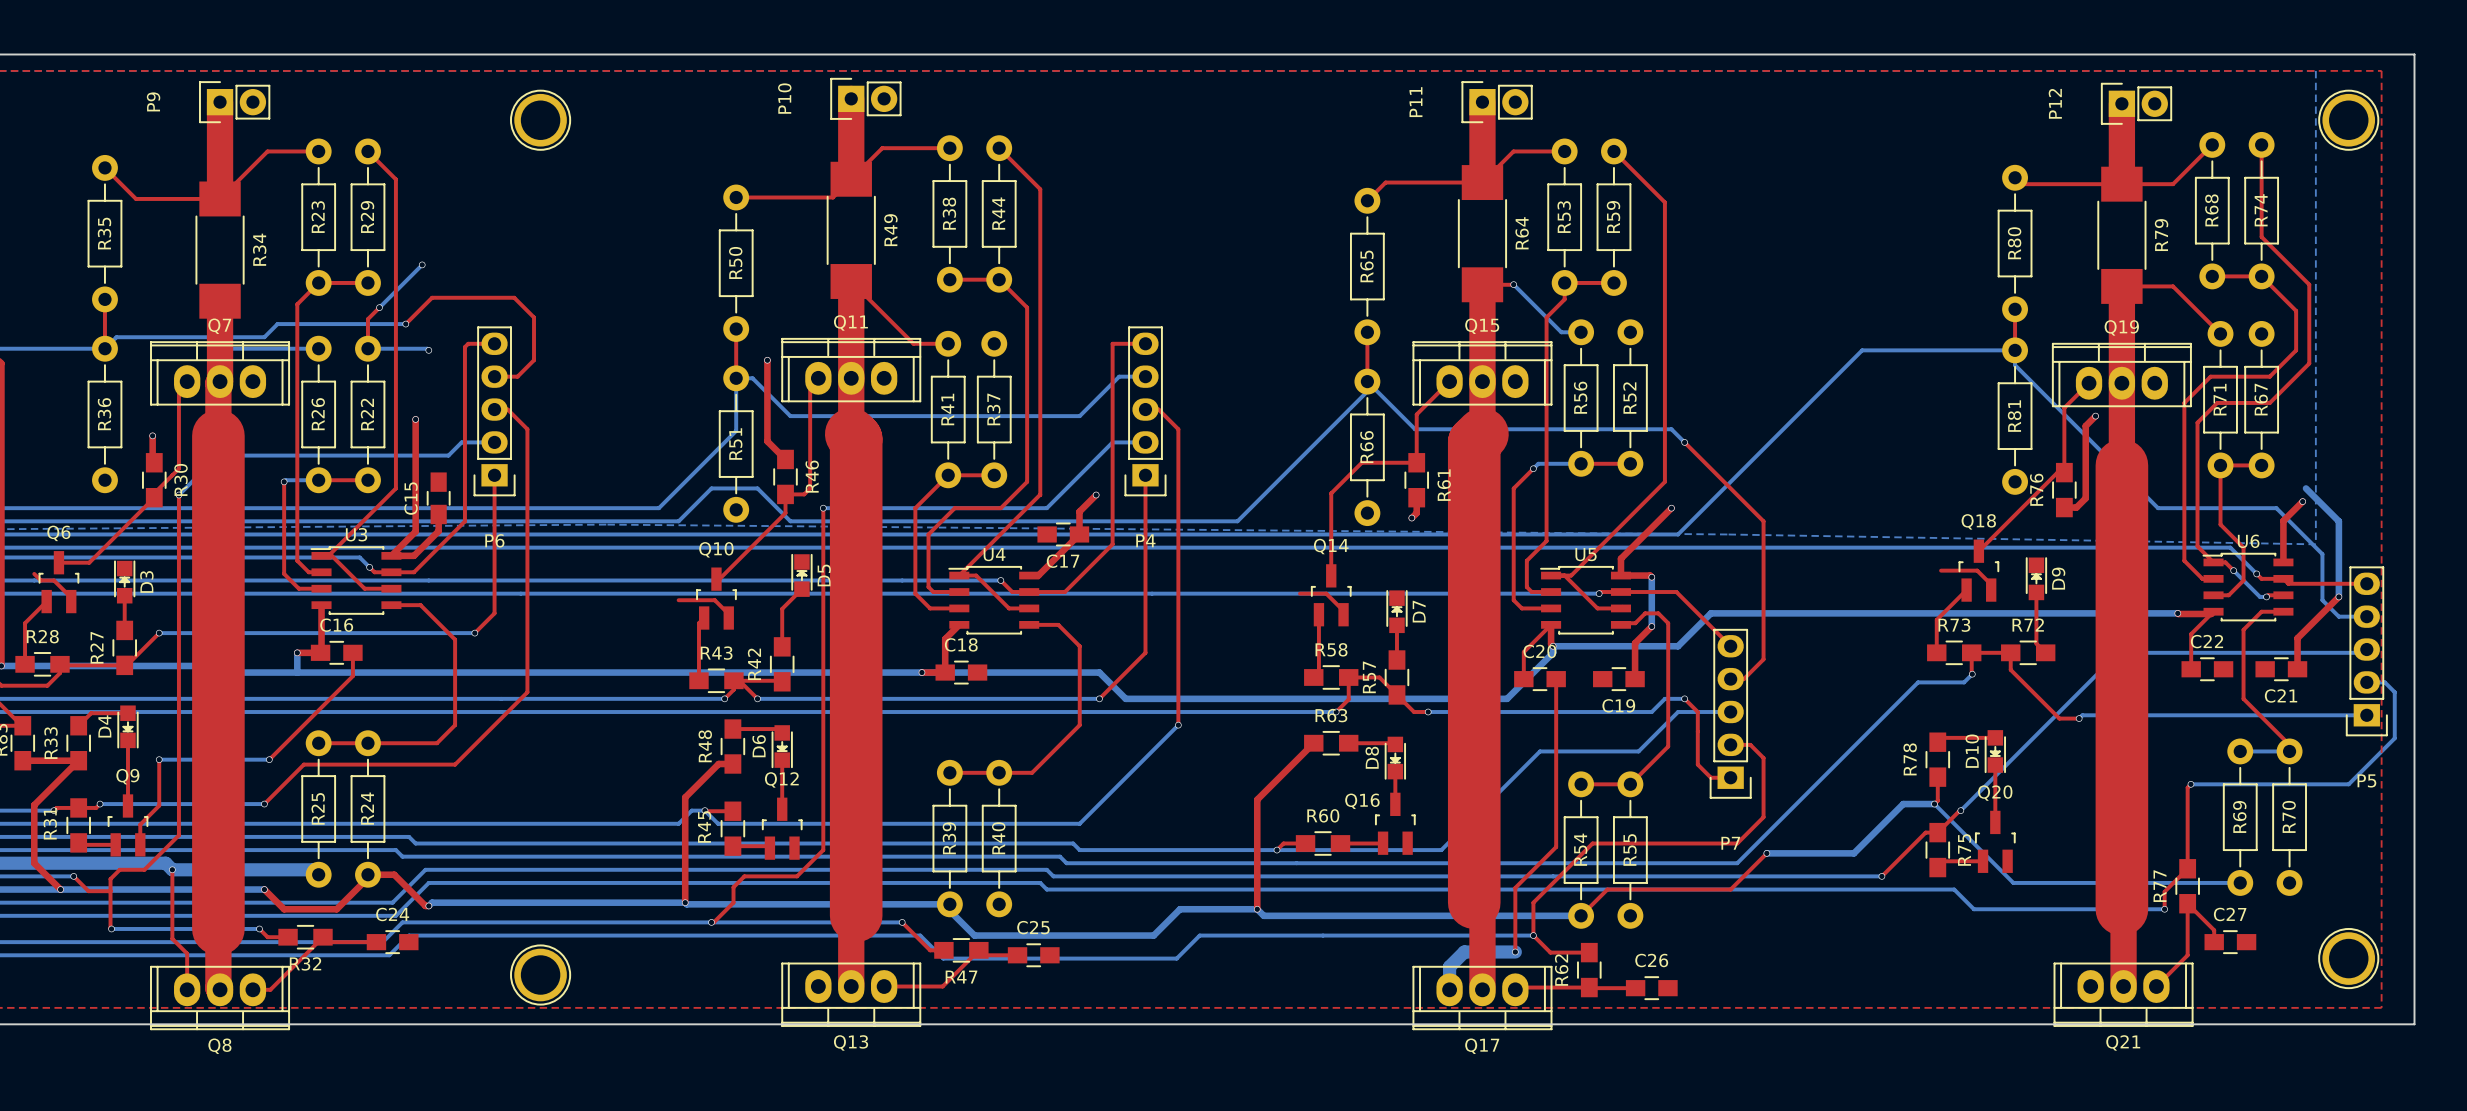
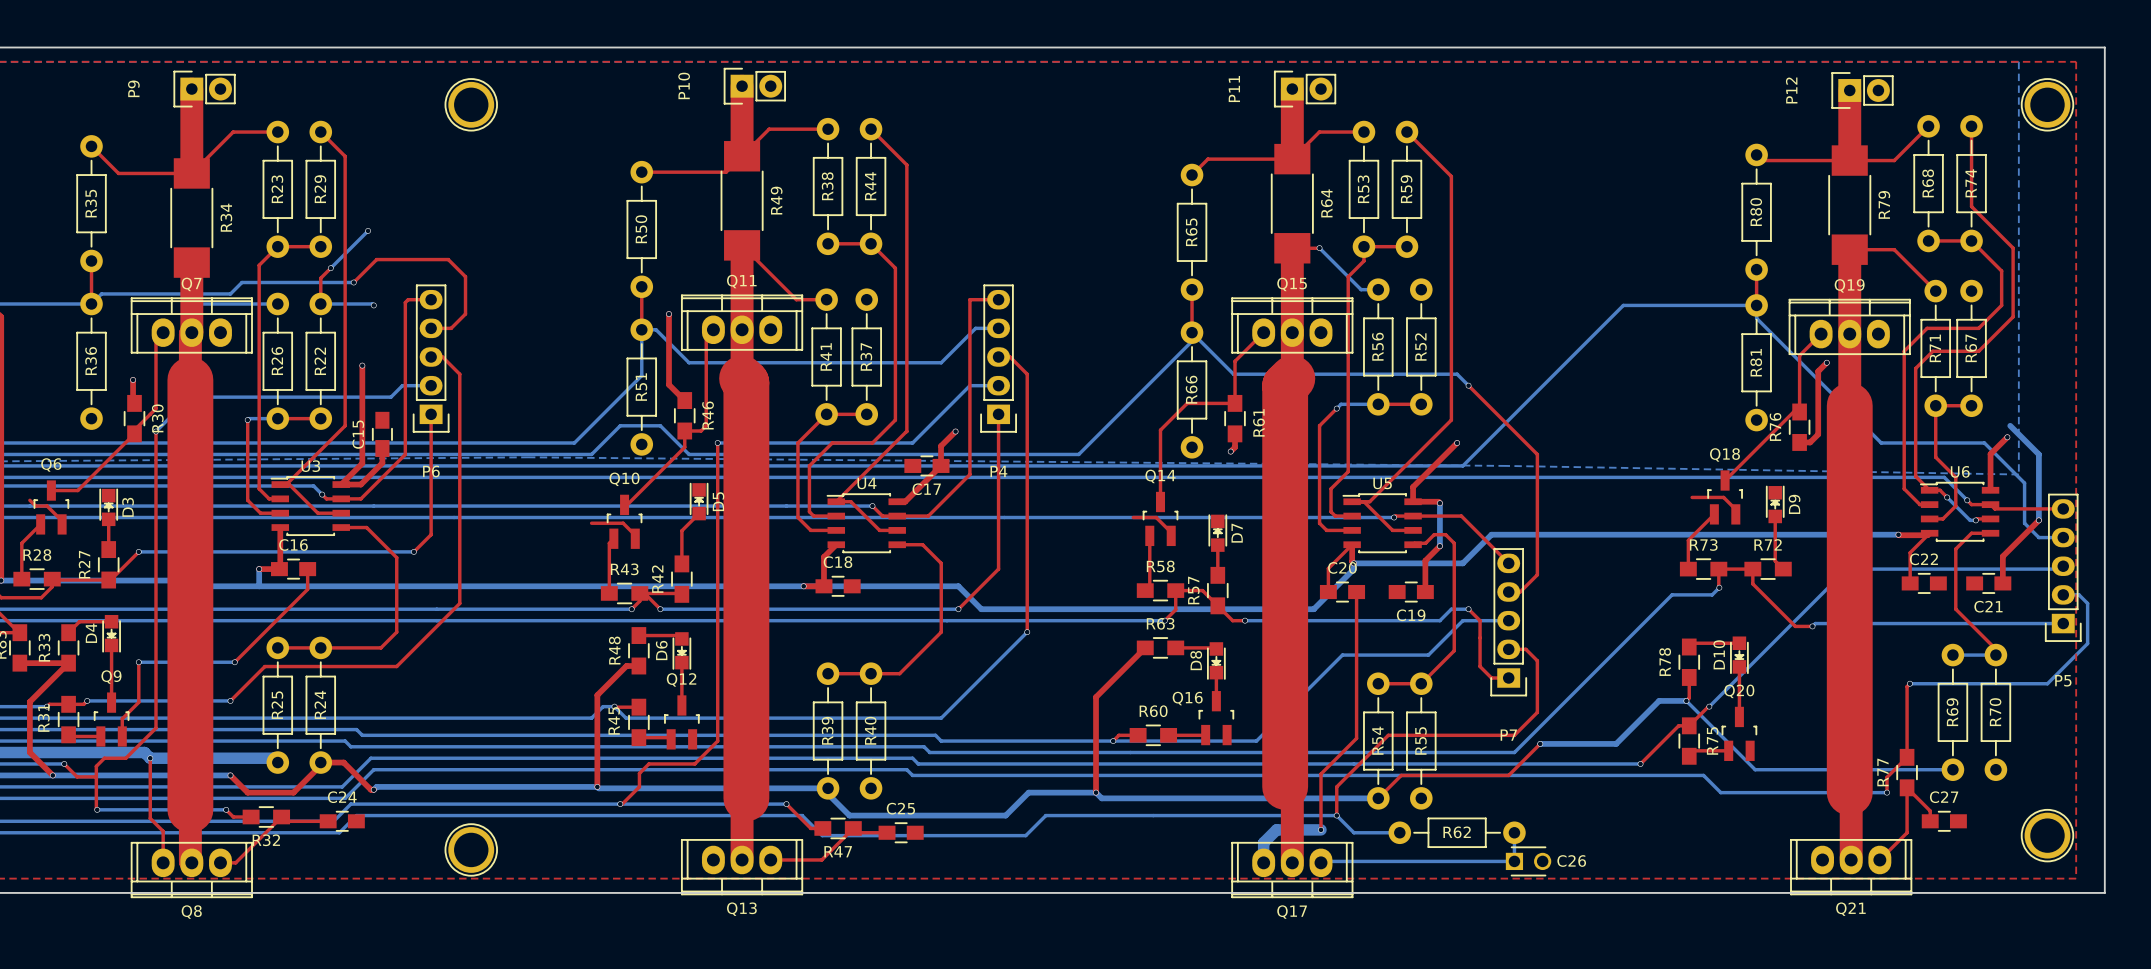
bottom track: none -> (1336, 815) (1353, 832) (1399, 832)
top track: (1533, 935) (1550, 952) (1589, 952) -> none
R62 footprint: [1577, 942, 1602, 998] -> [1388, 817, 1526, 848]
bottom track: none -> (1514, 832) (1514, 861) (1320, 862)
C26 name position: C26 (1651, 960) -> C26 (1571, 861)
R62 name position: R62 (1561, 970) -> R62 (1457, 832)
C26 footprint: [1625, 976, 1678, 1001] -> [1505, 846, 1552, 877]
top track: (1517, 987) (1635, 988) -> none

